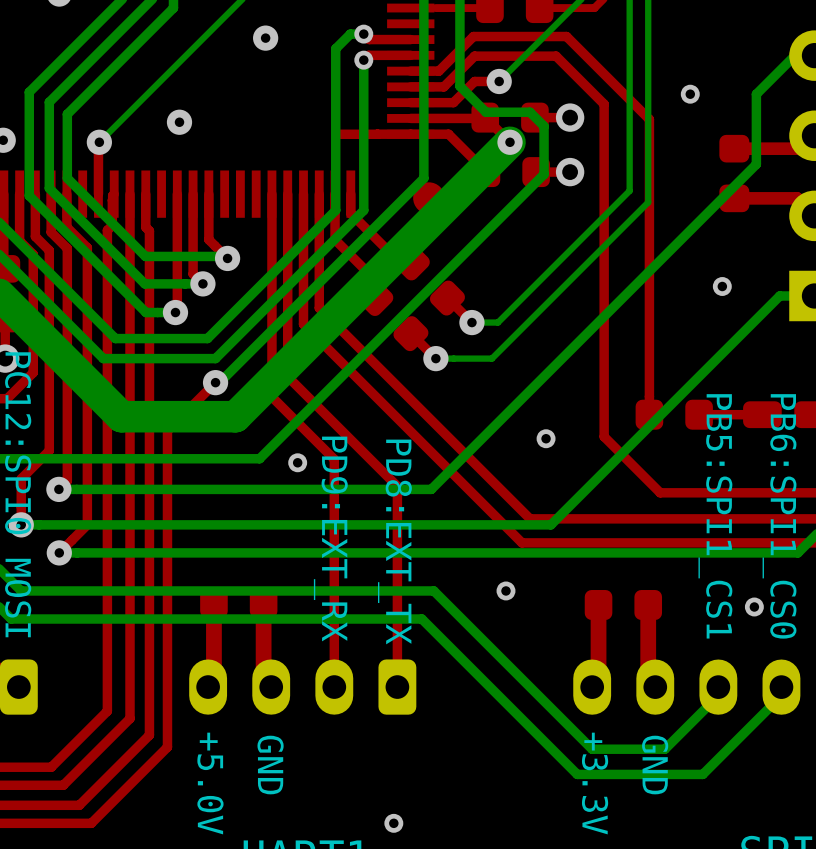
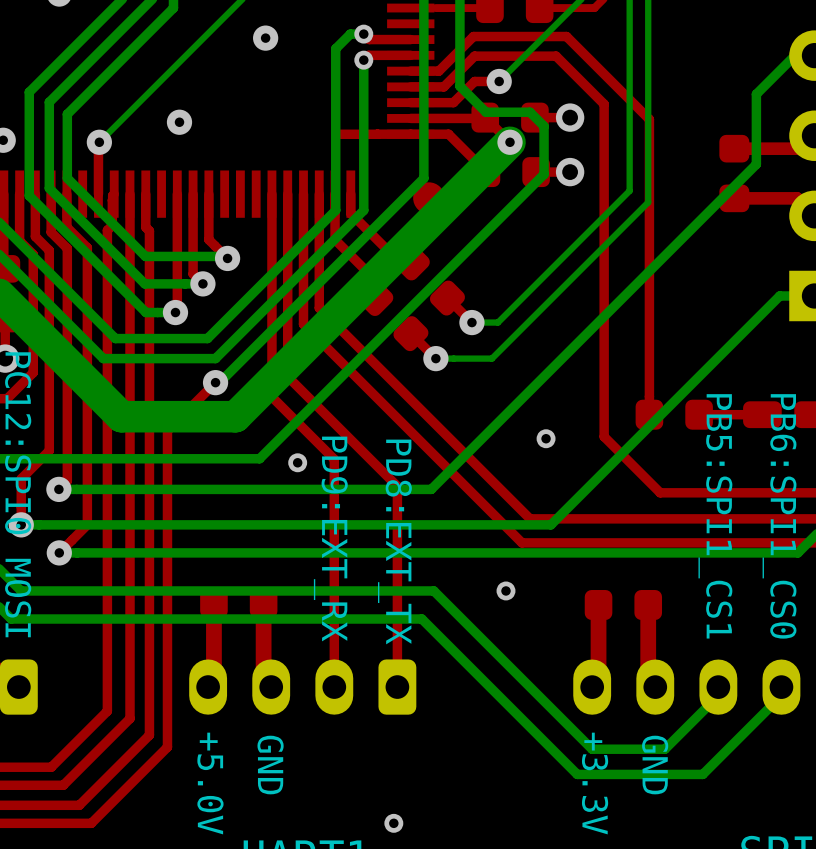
via: (690, 94) -> none
via: (722, 286) -> none
via: (754, 606) -> none

